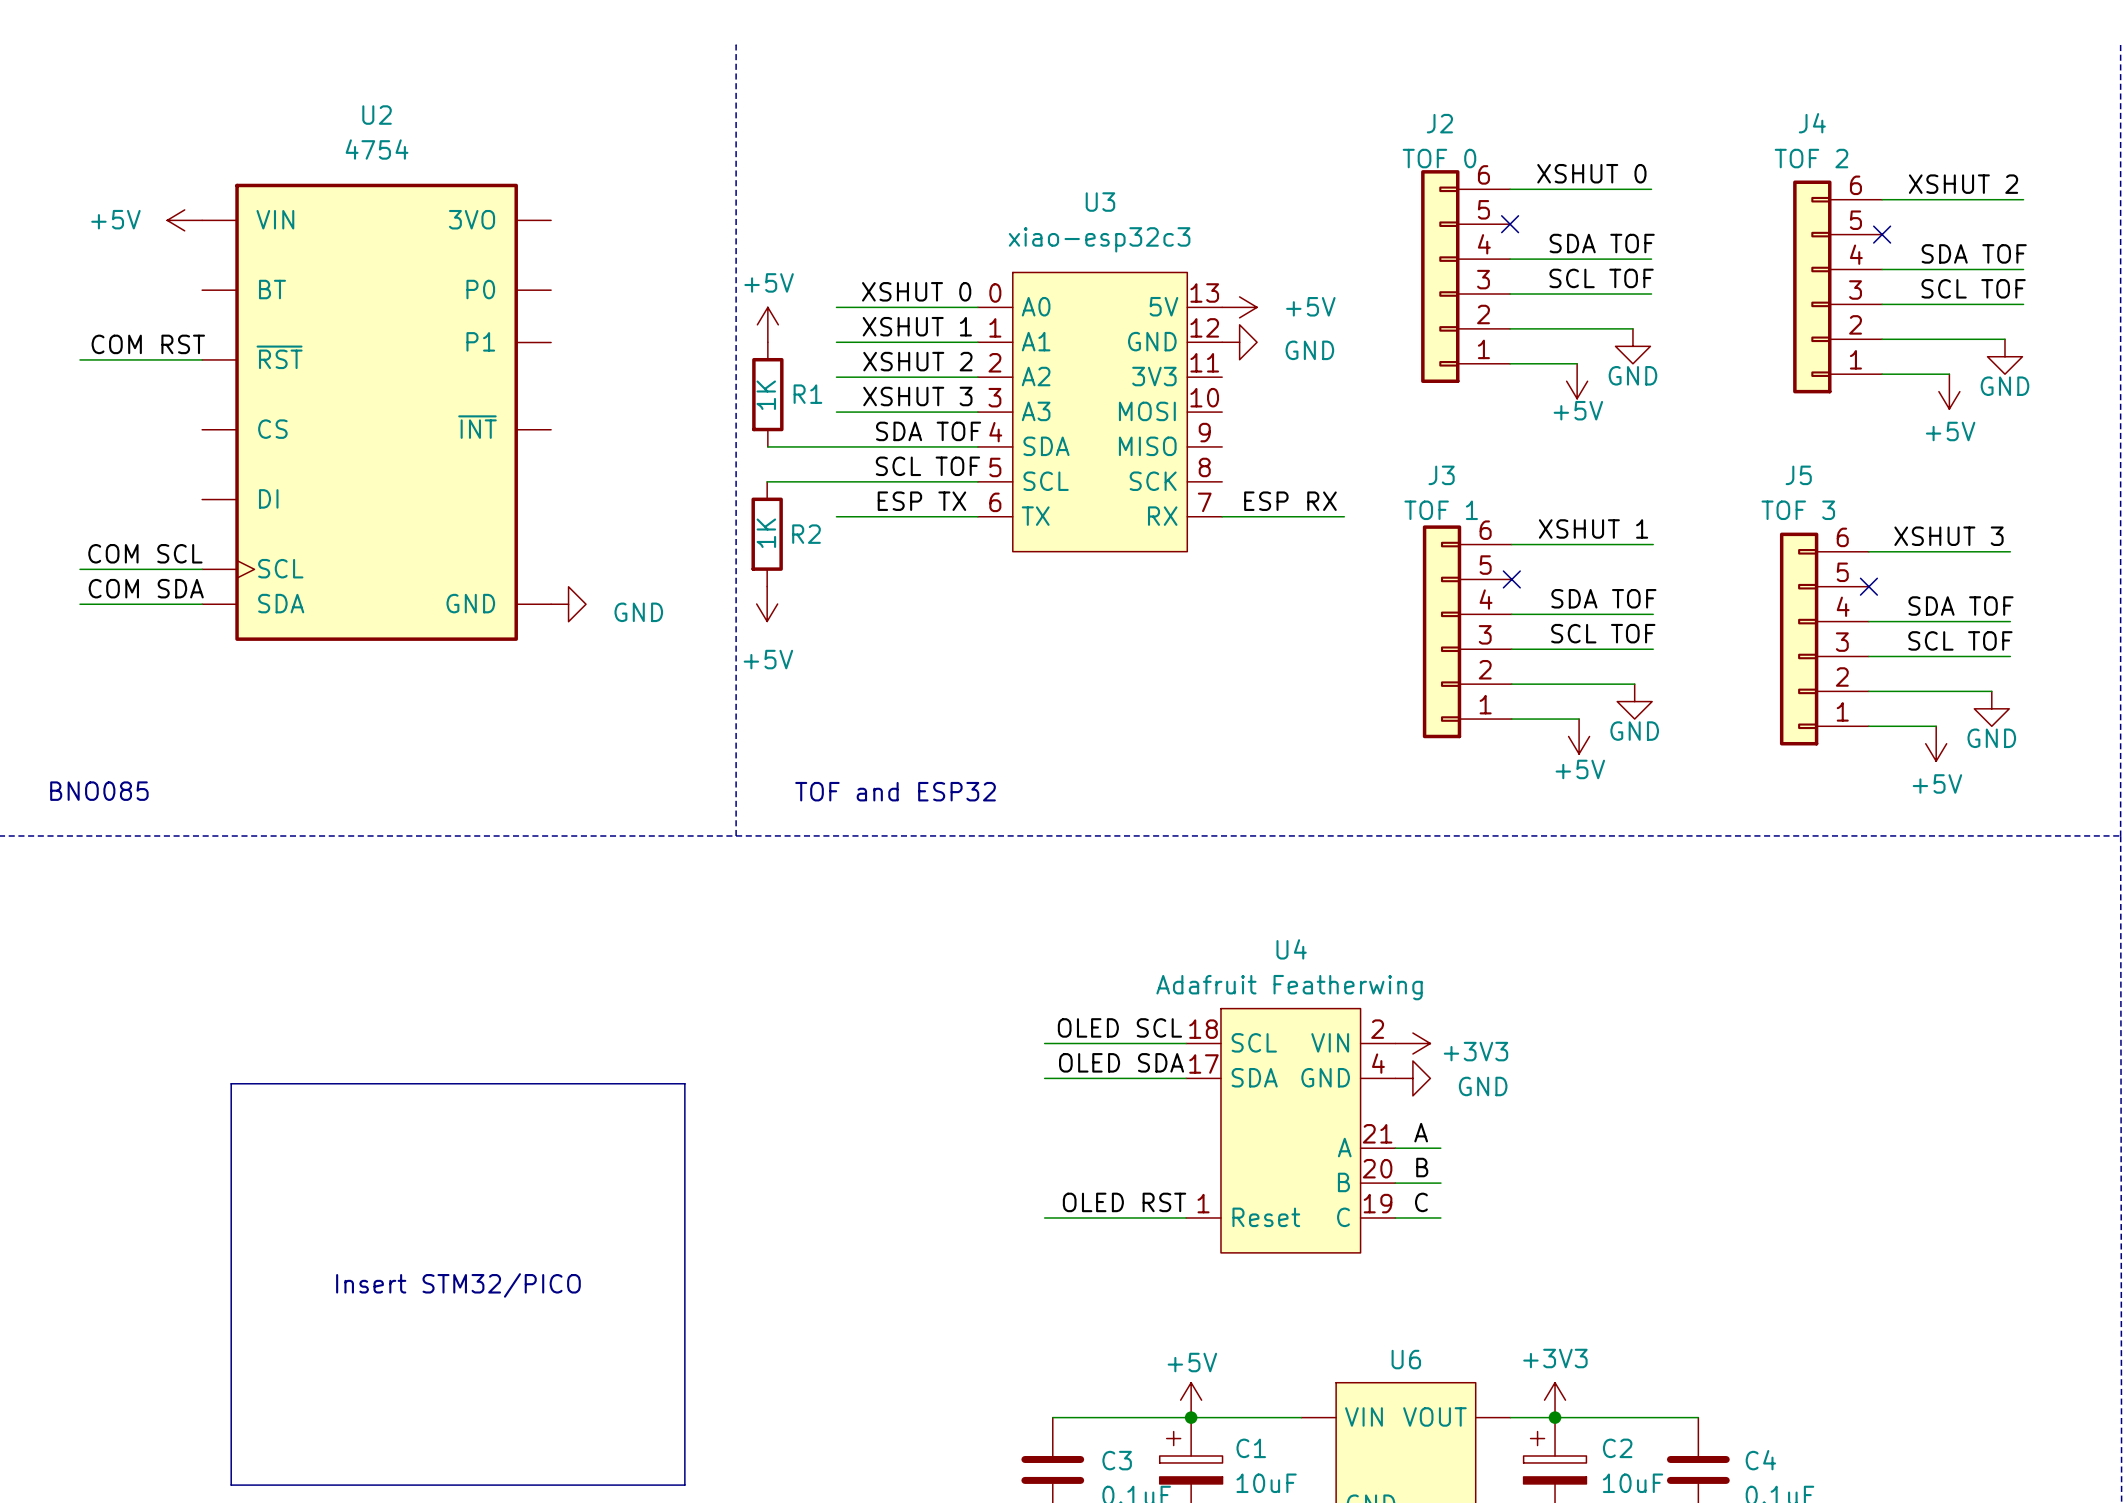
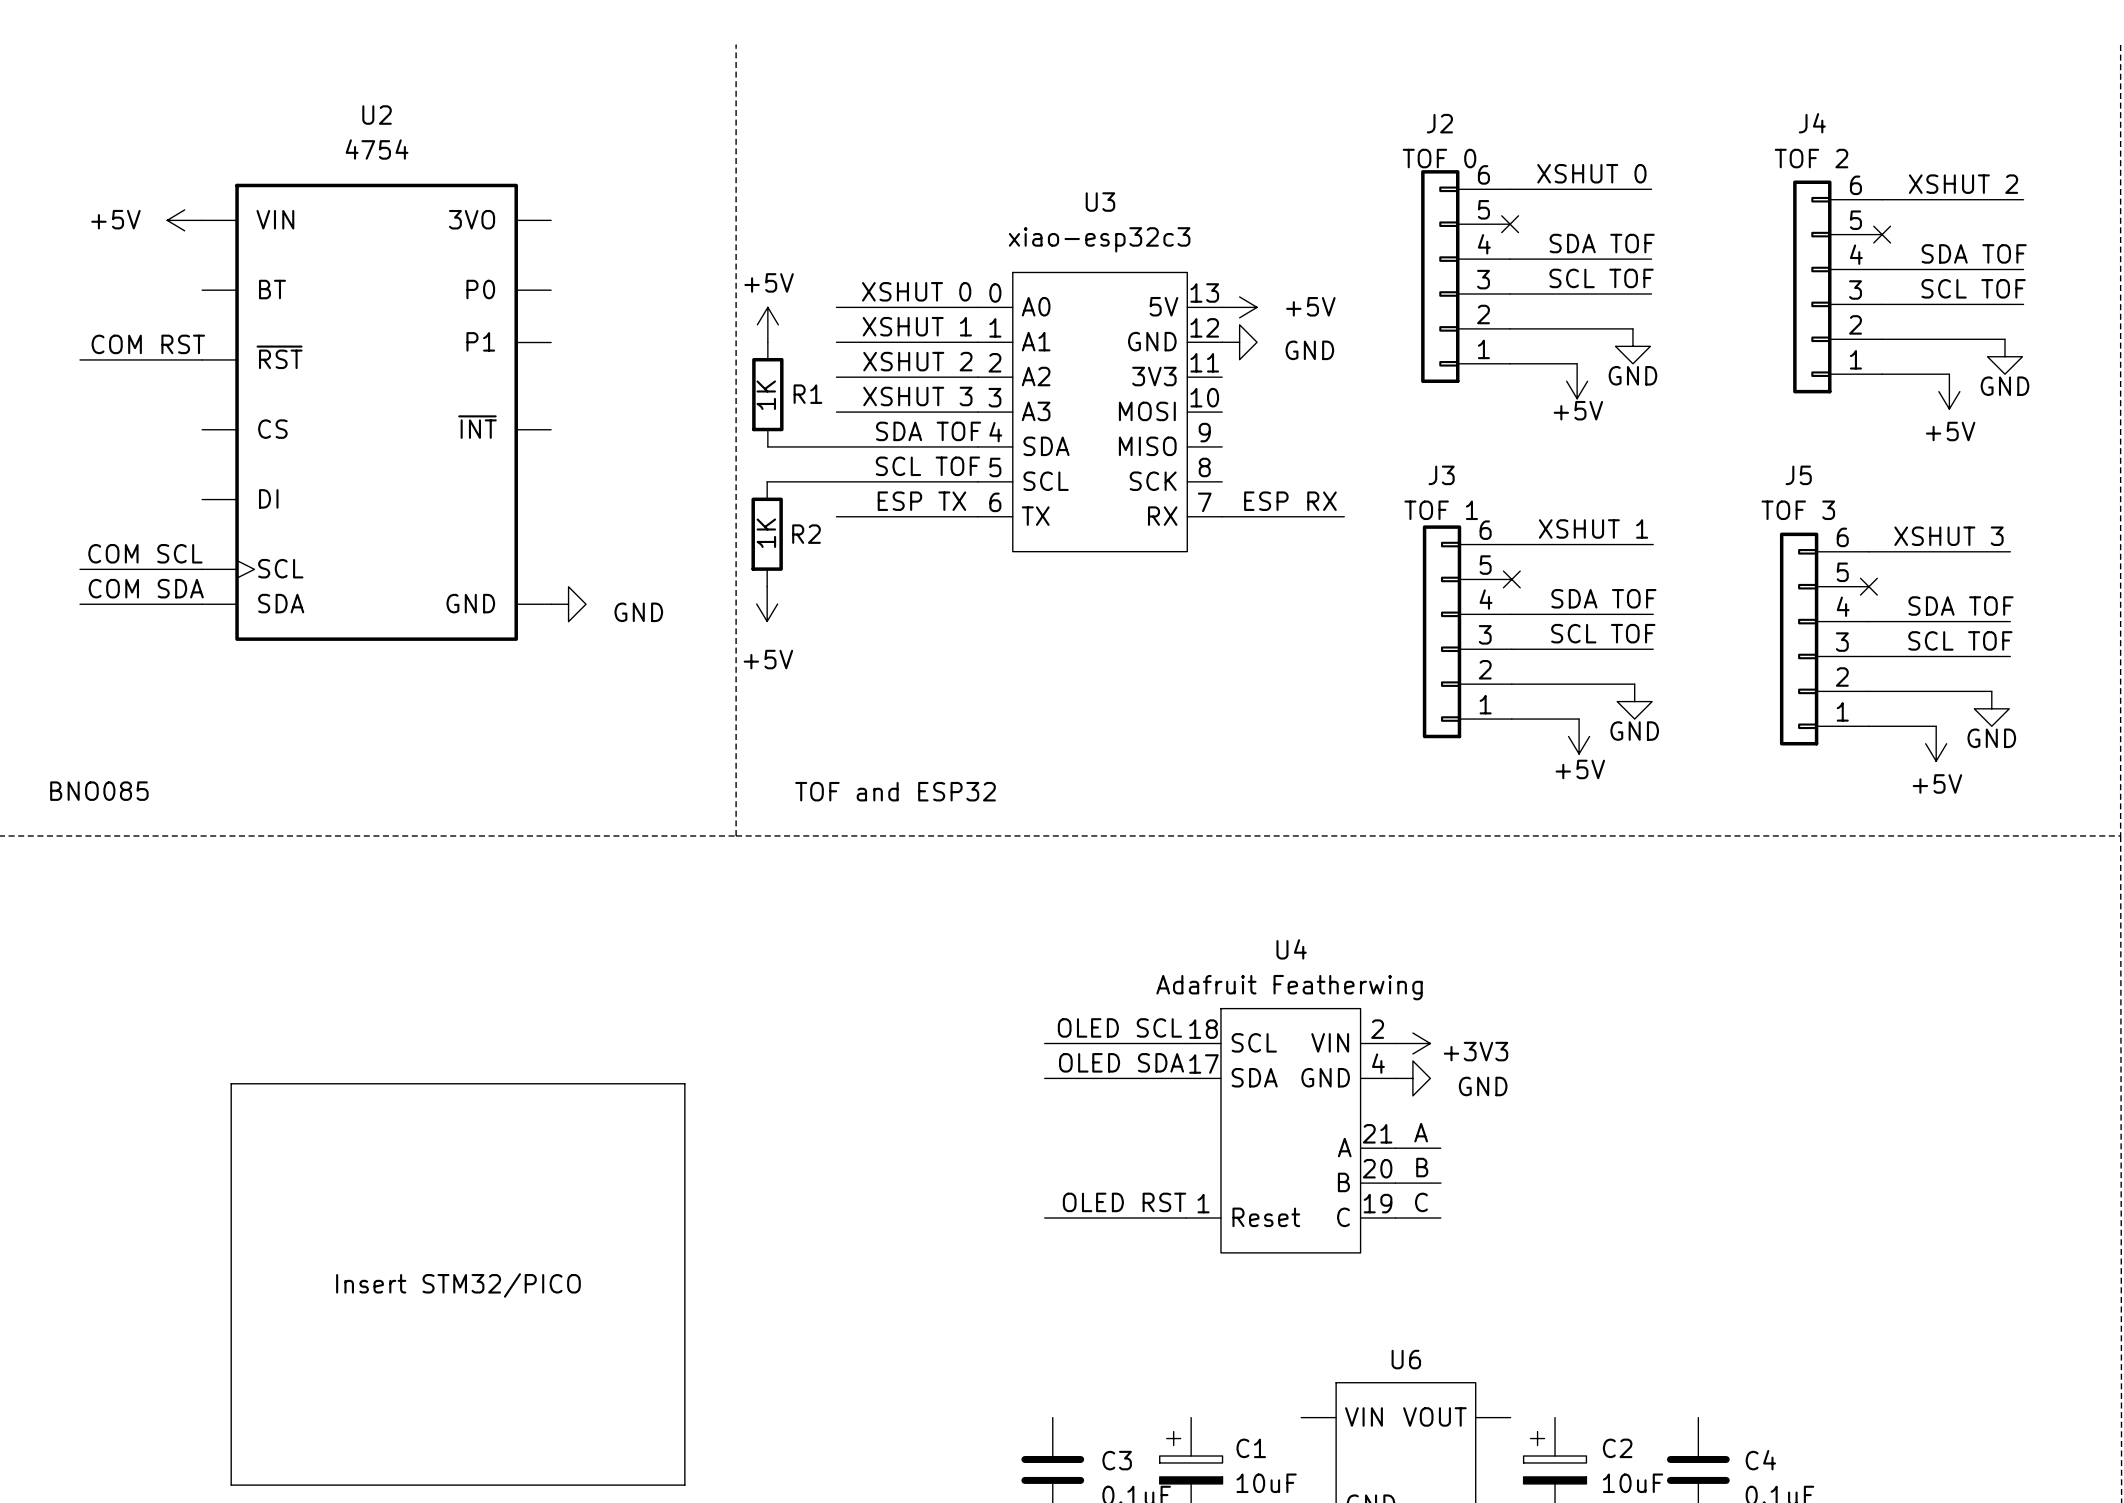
power symbol: +5V (1191, 1400) -> none
power symbol: +3V3 (1555, 1400) -> none
wire: (1052, 1417) (1301, 1417) -> none
junction: (1191, 1417) -> none
wire: (1510, 1417) (1698, 1417) -> none
junction: (1555, 1417) -> none

